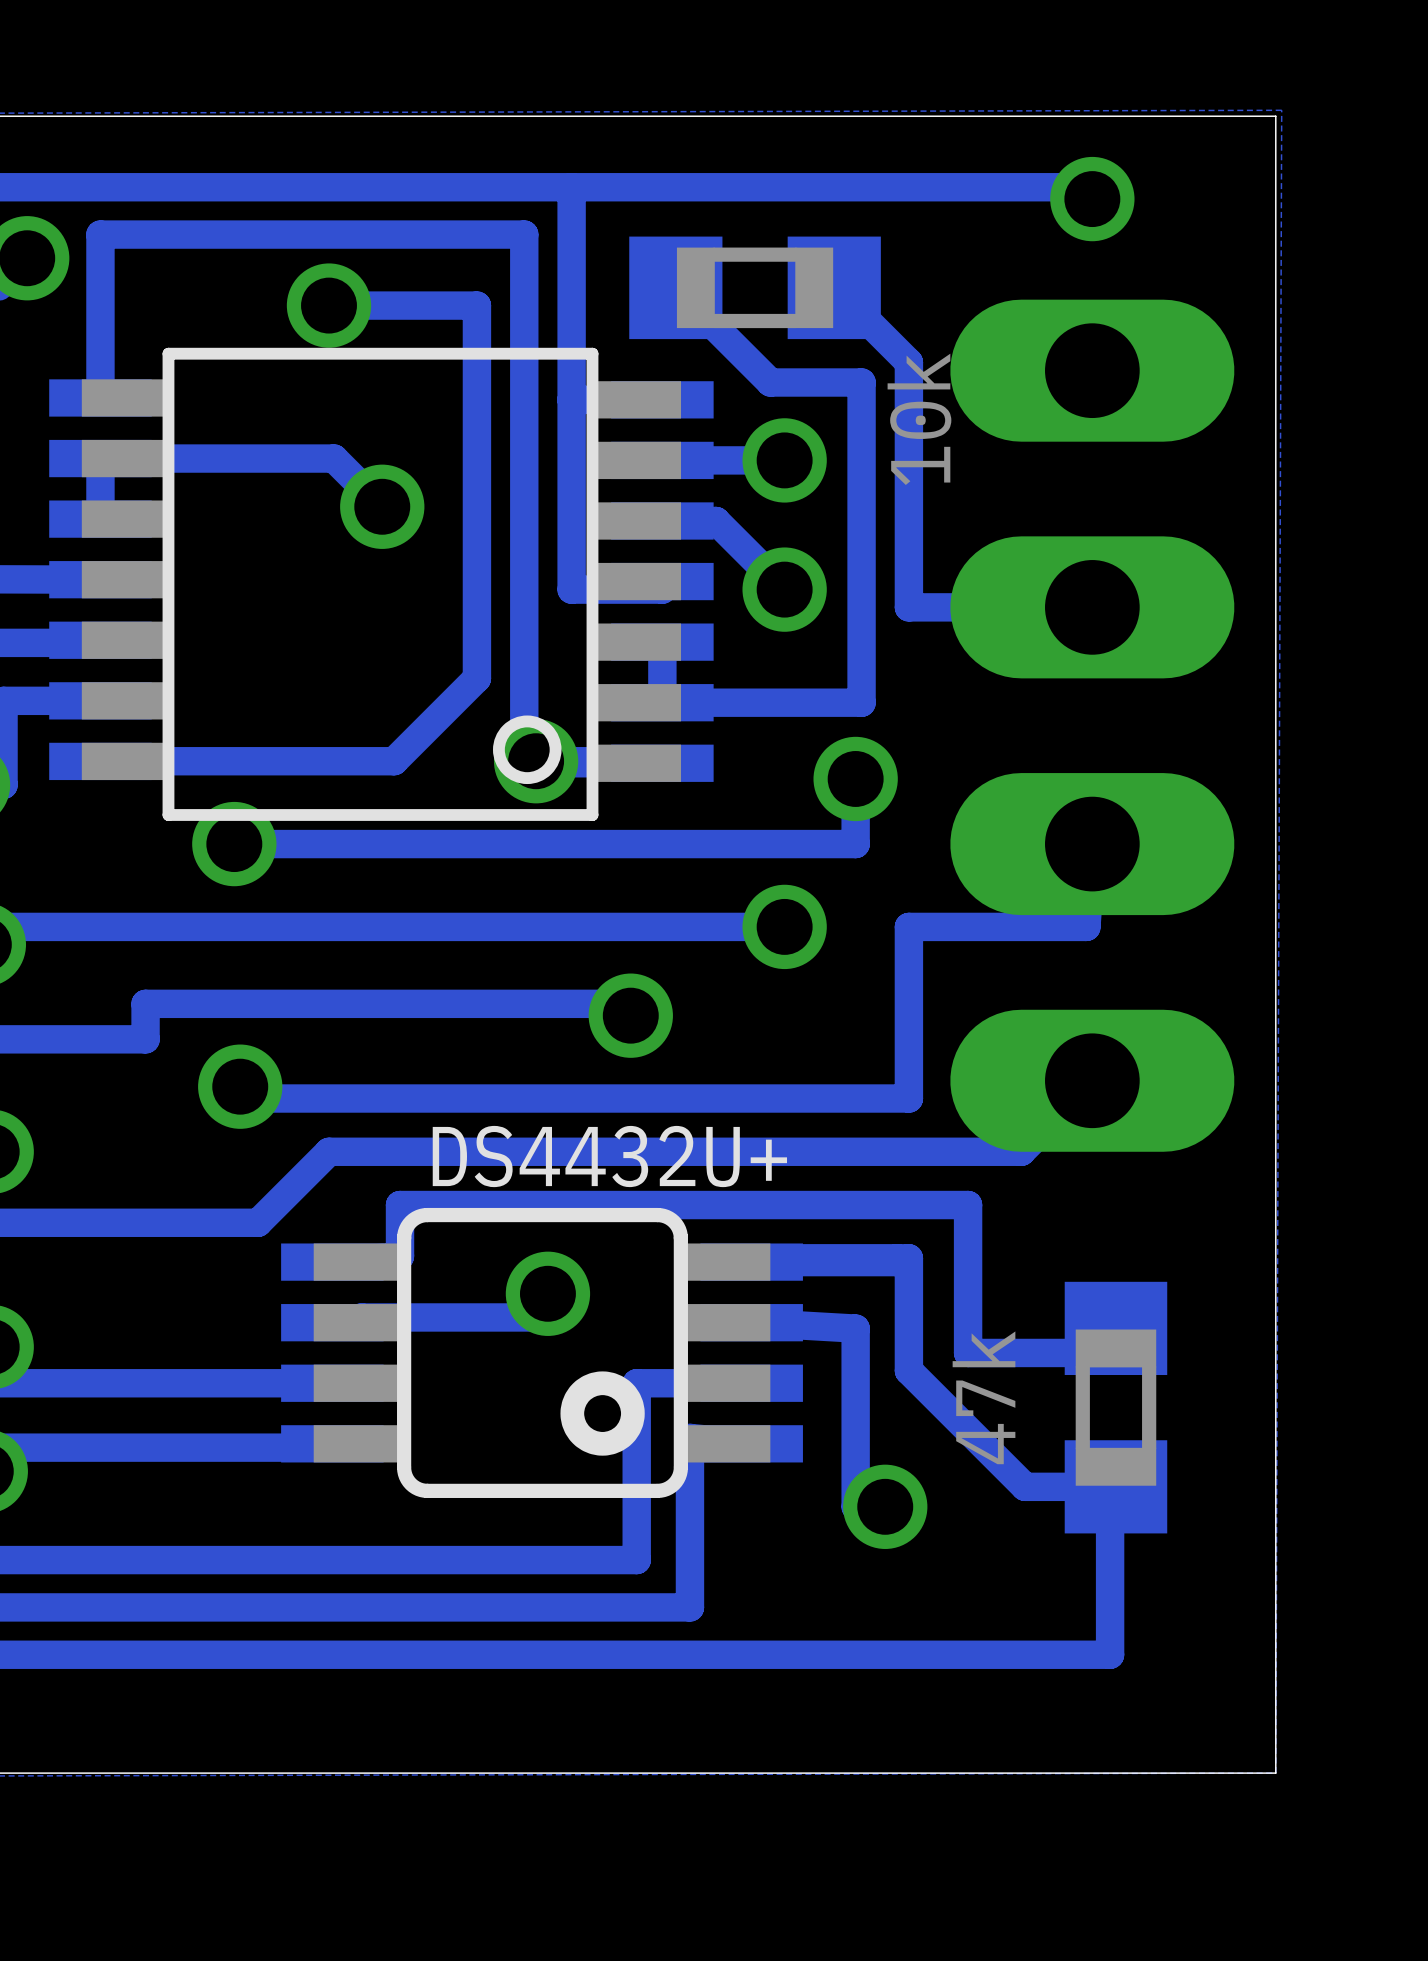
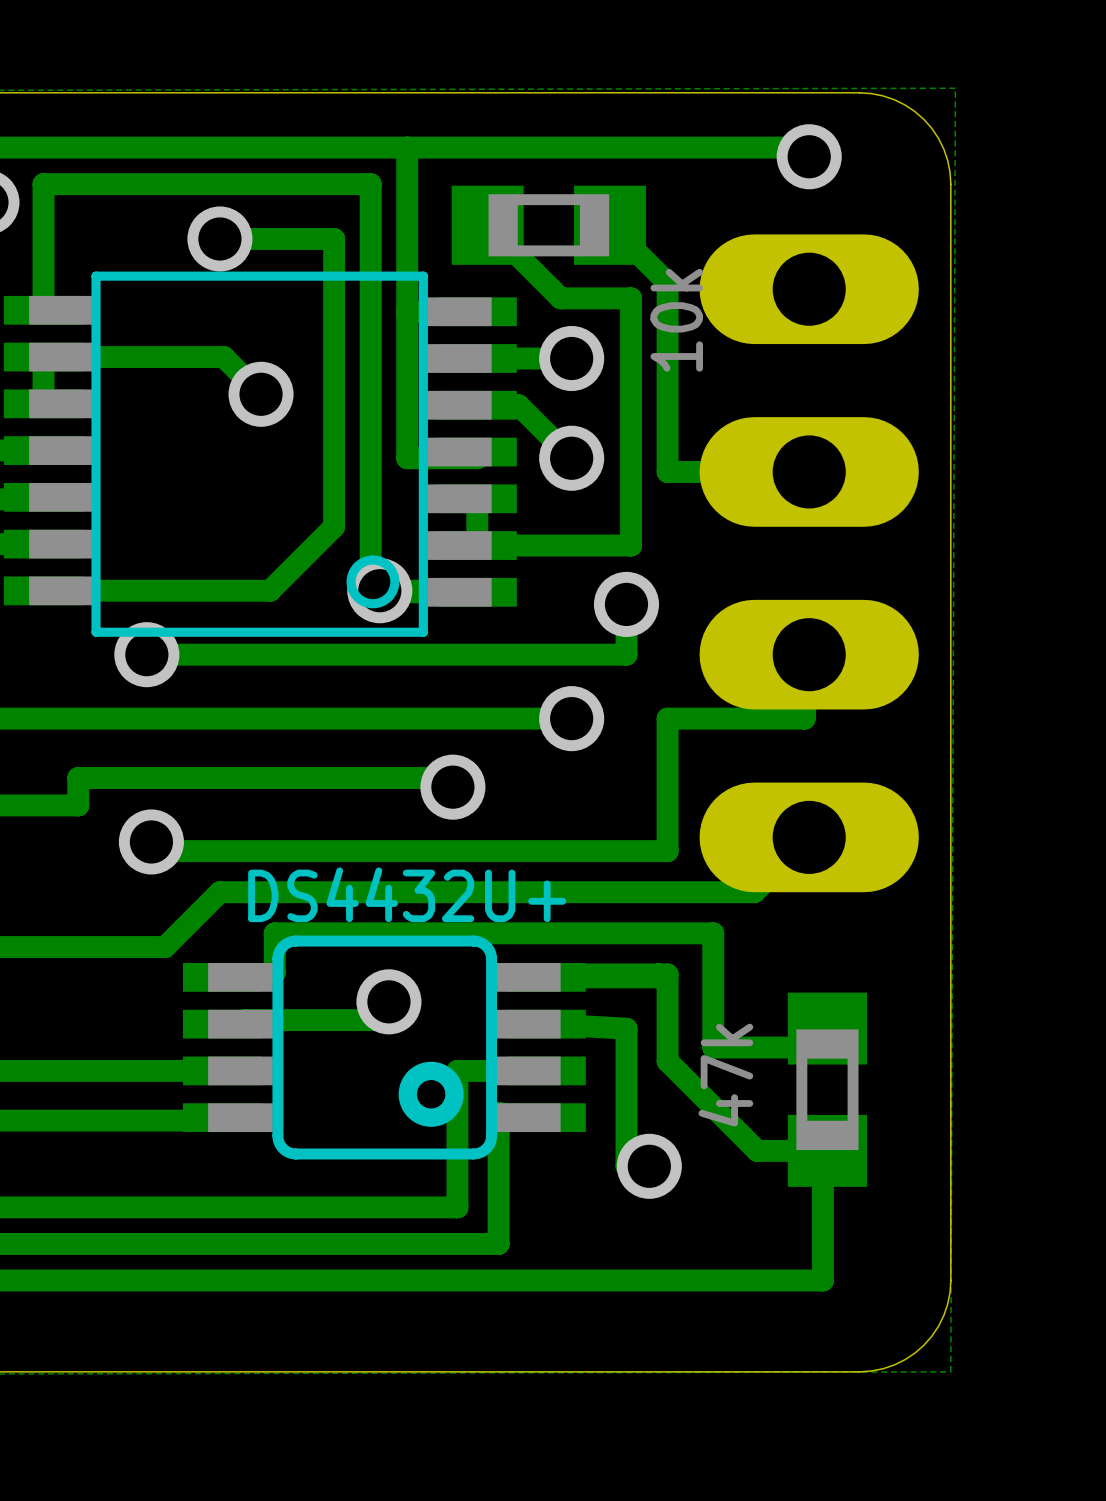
board edge: (1157, 116) (1275, 116) (1275, 234) -> (859, 92) (883, 95) (894, 99) (905, 105) (924, 119) (938, 138) (943, 149) (947, 160) (950, 184)
board edge: (1275, 1654) (1275, 1773) (1157, 1773) -> (950, 1280) (947, 1304) (943, 1315) (938, 1326) (924, 1345) (905, 1359) (894, 1364) (883, 1368) (859, 1371)

